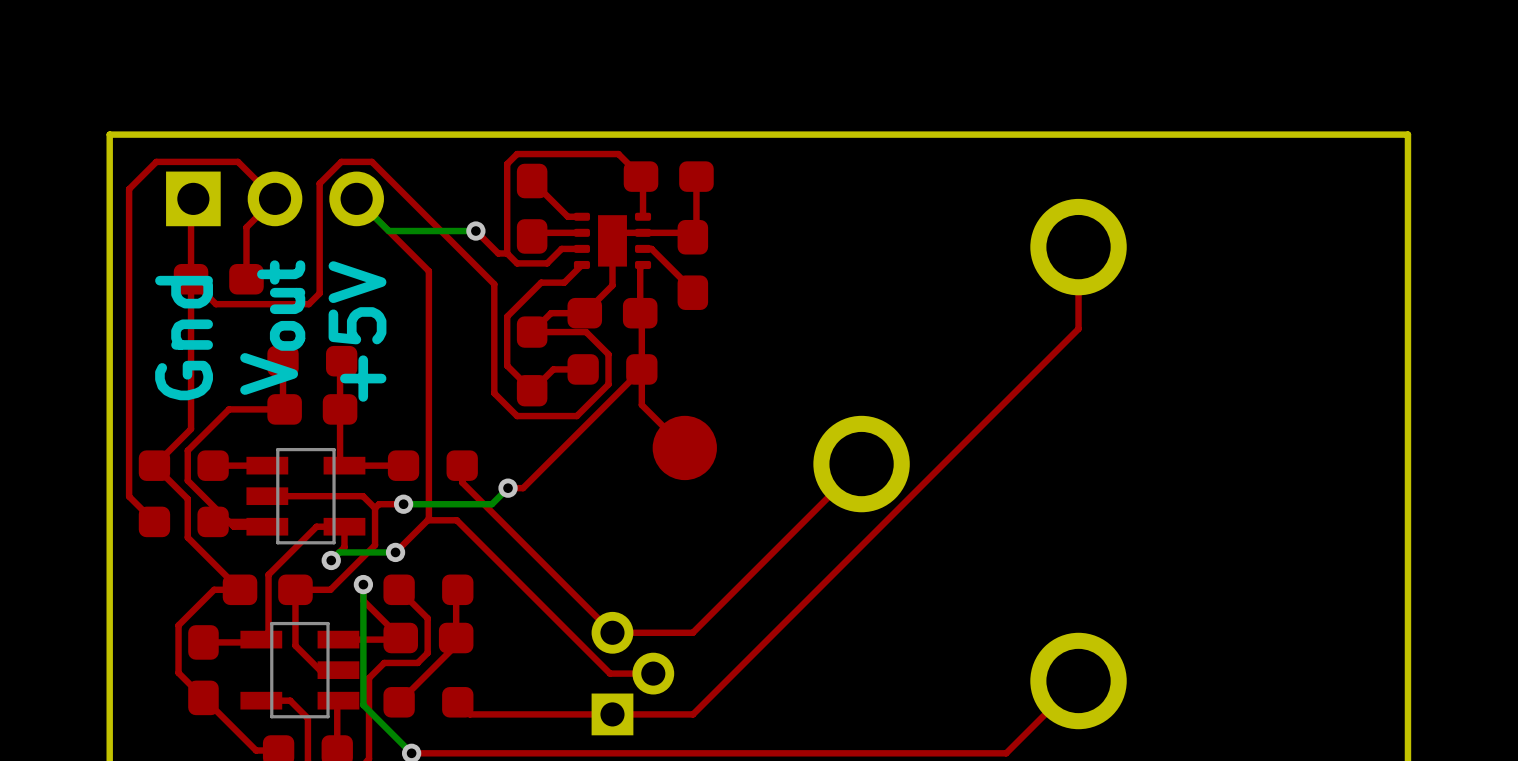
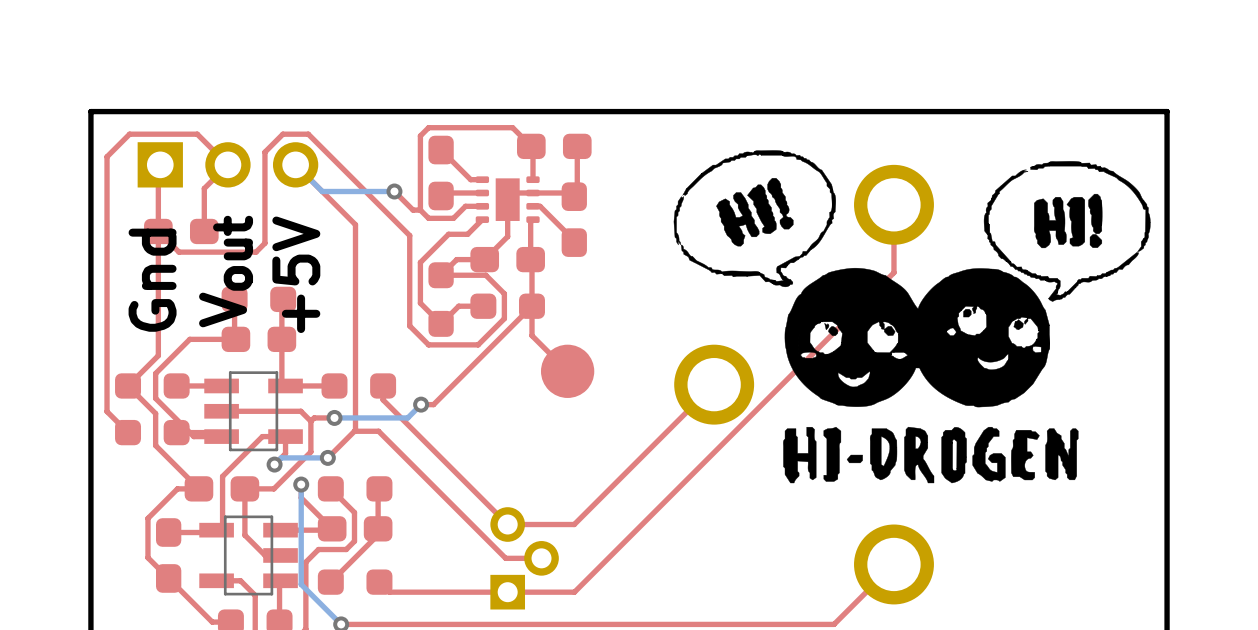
drawing: none -> [673, 150, 1151, 484]

